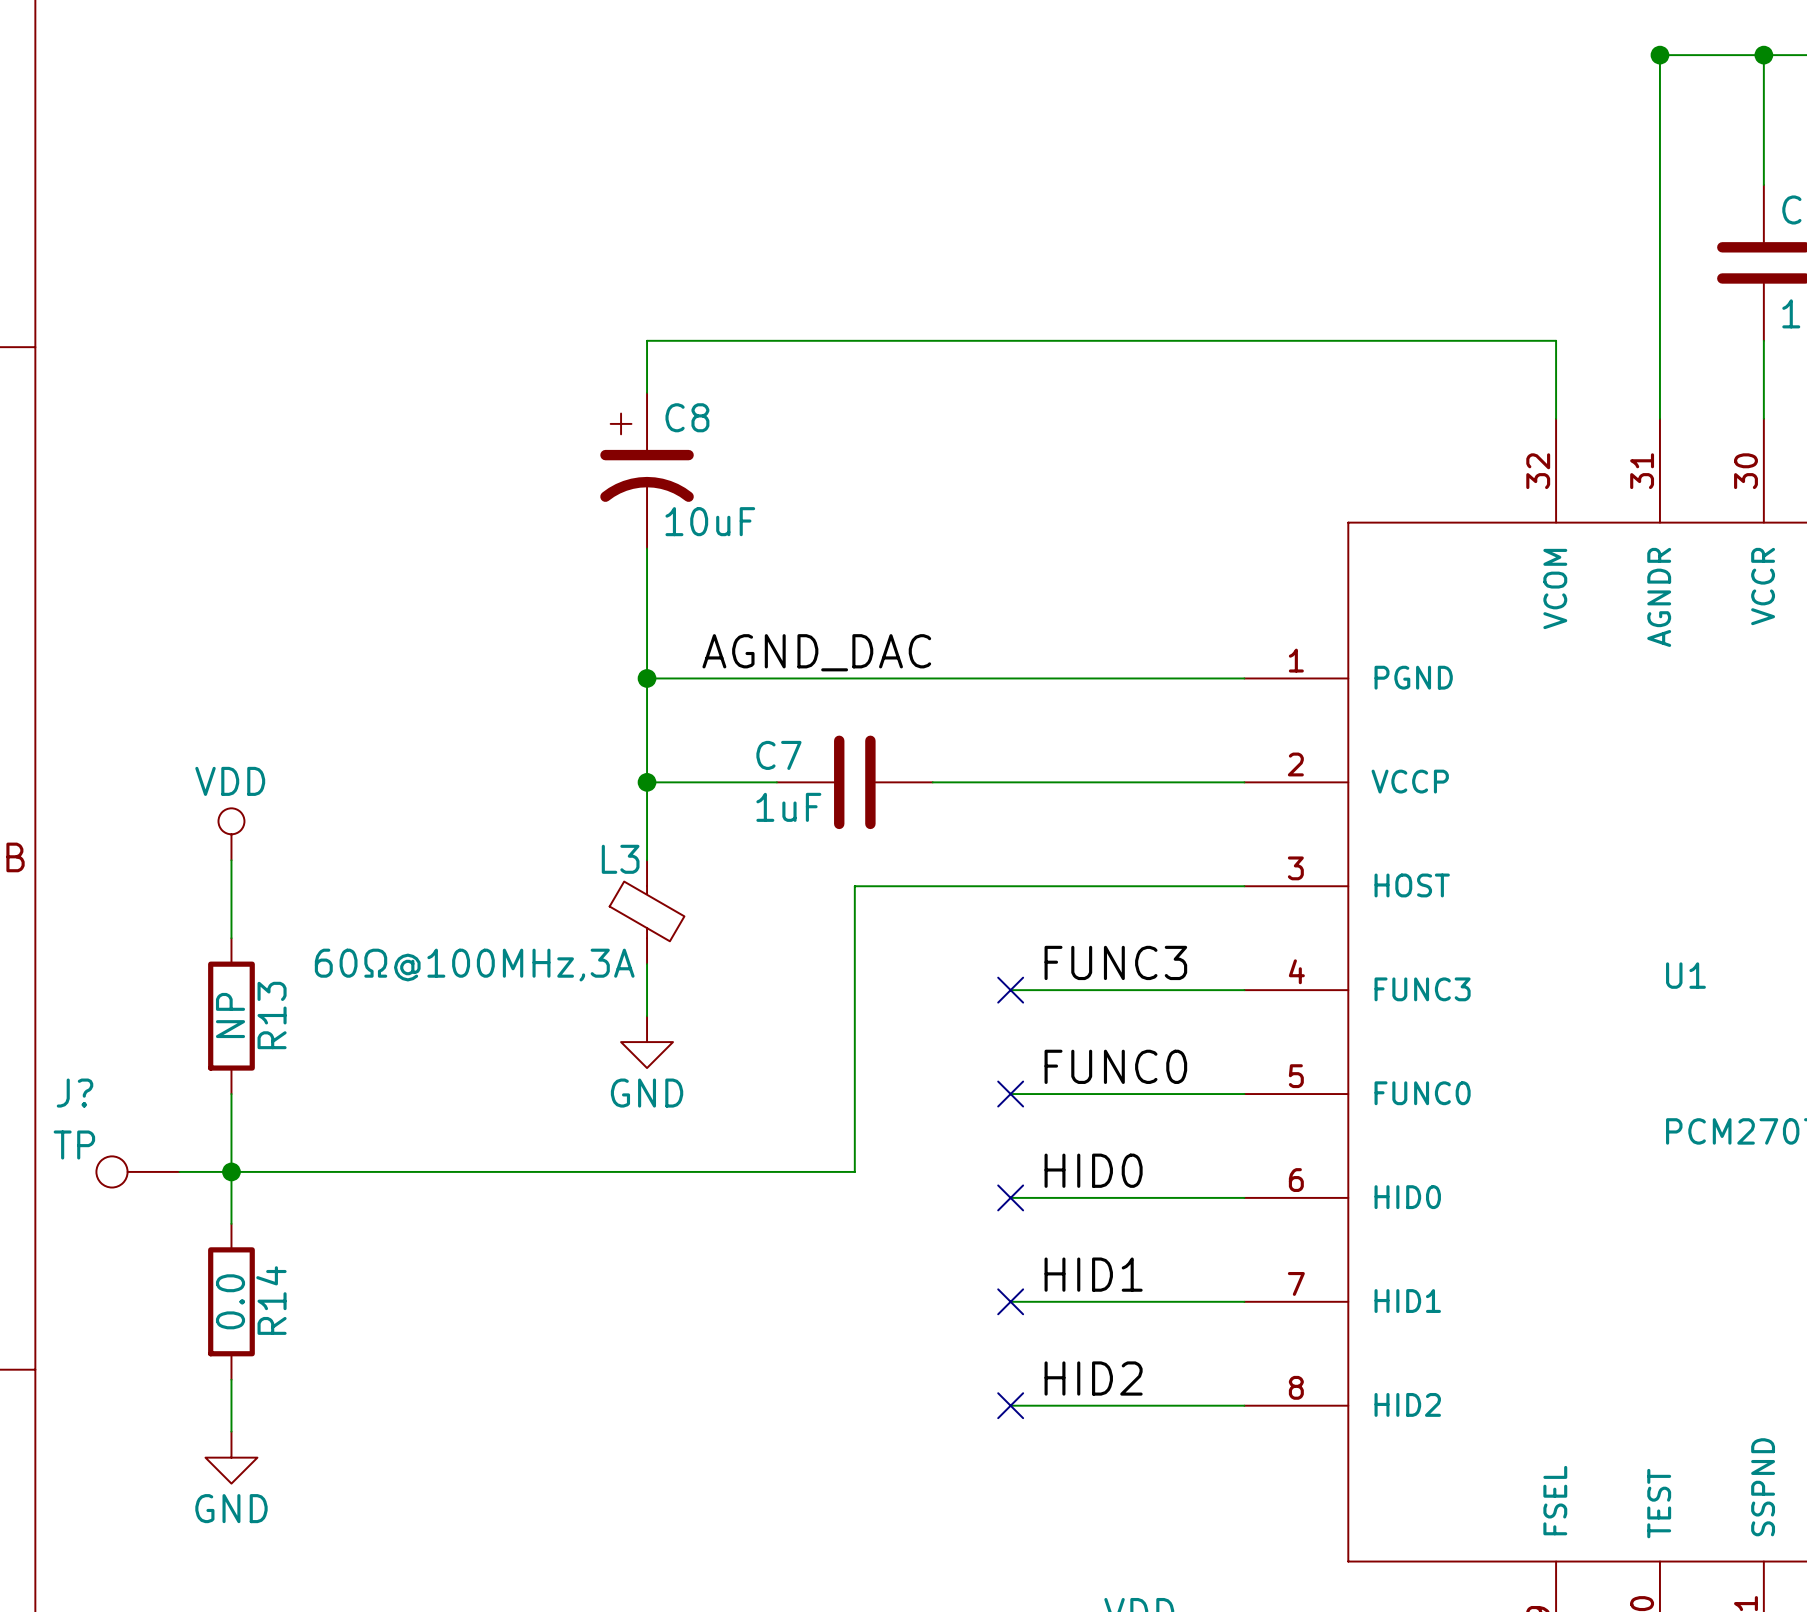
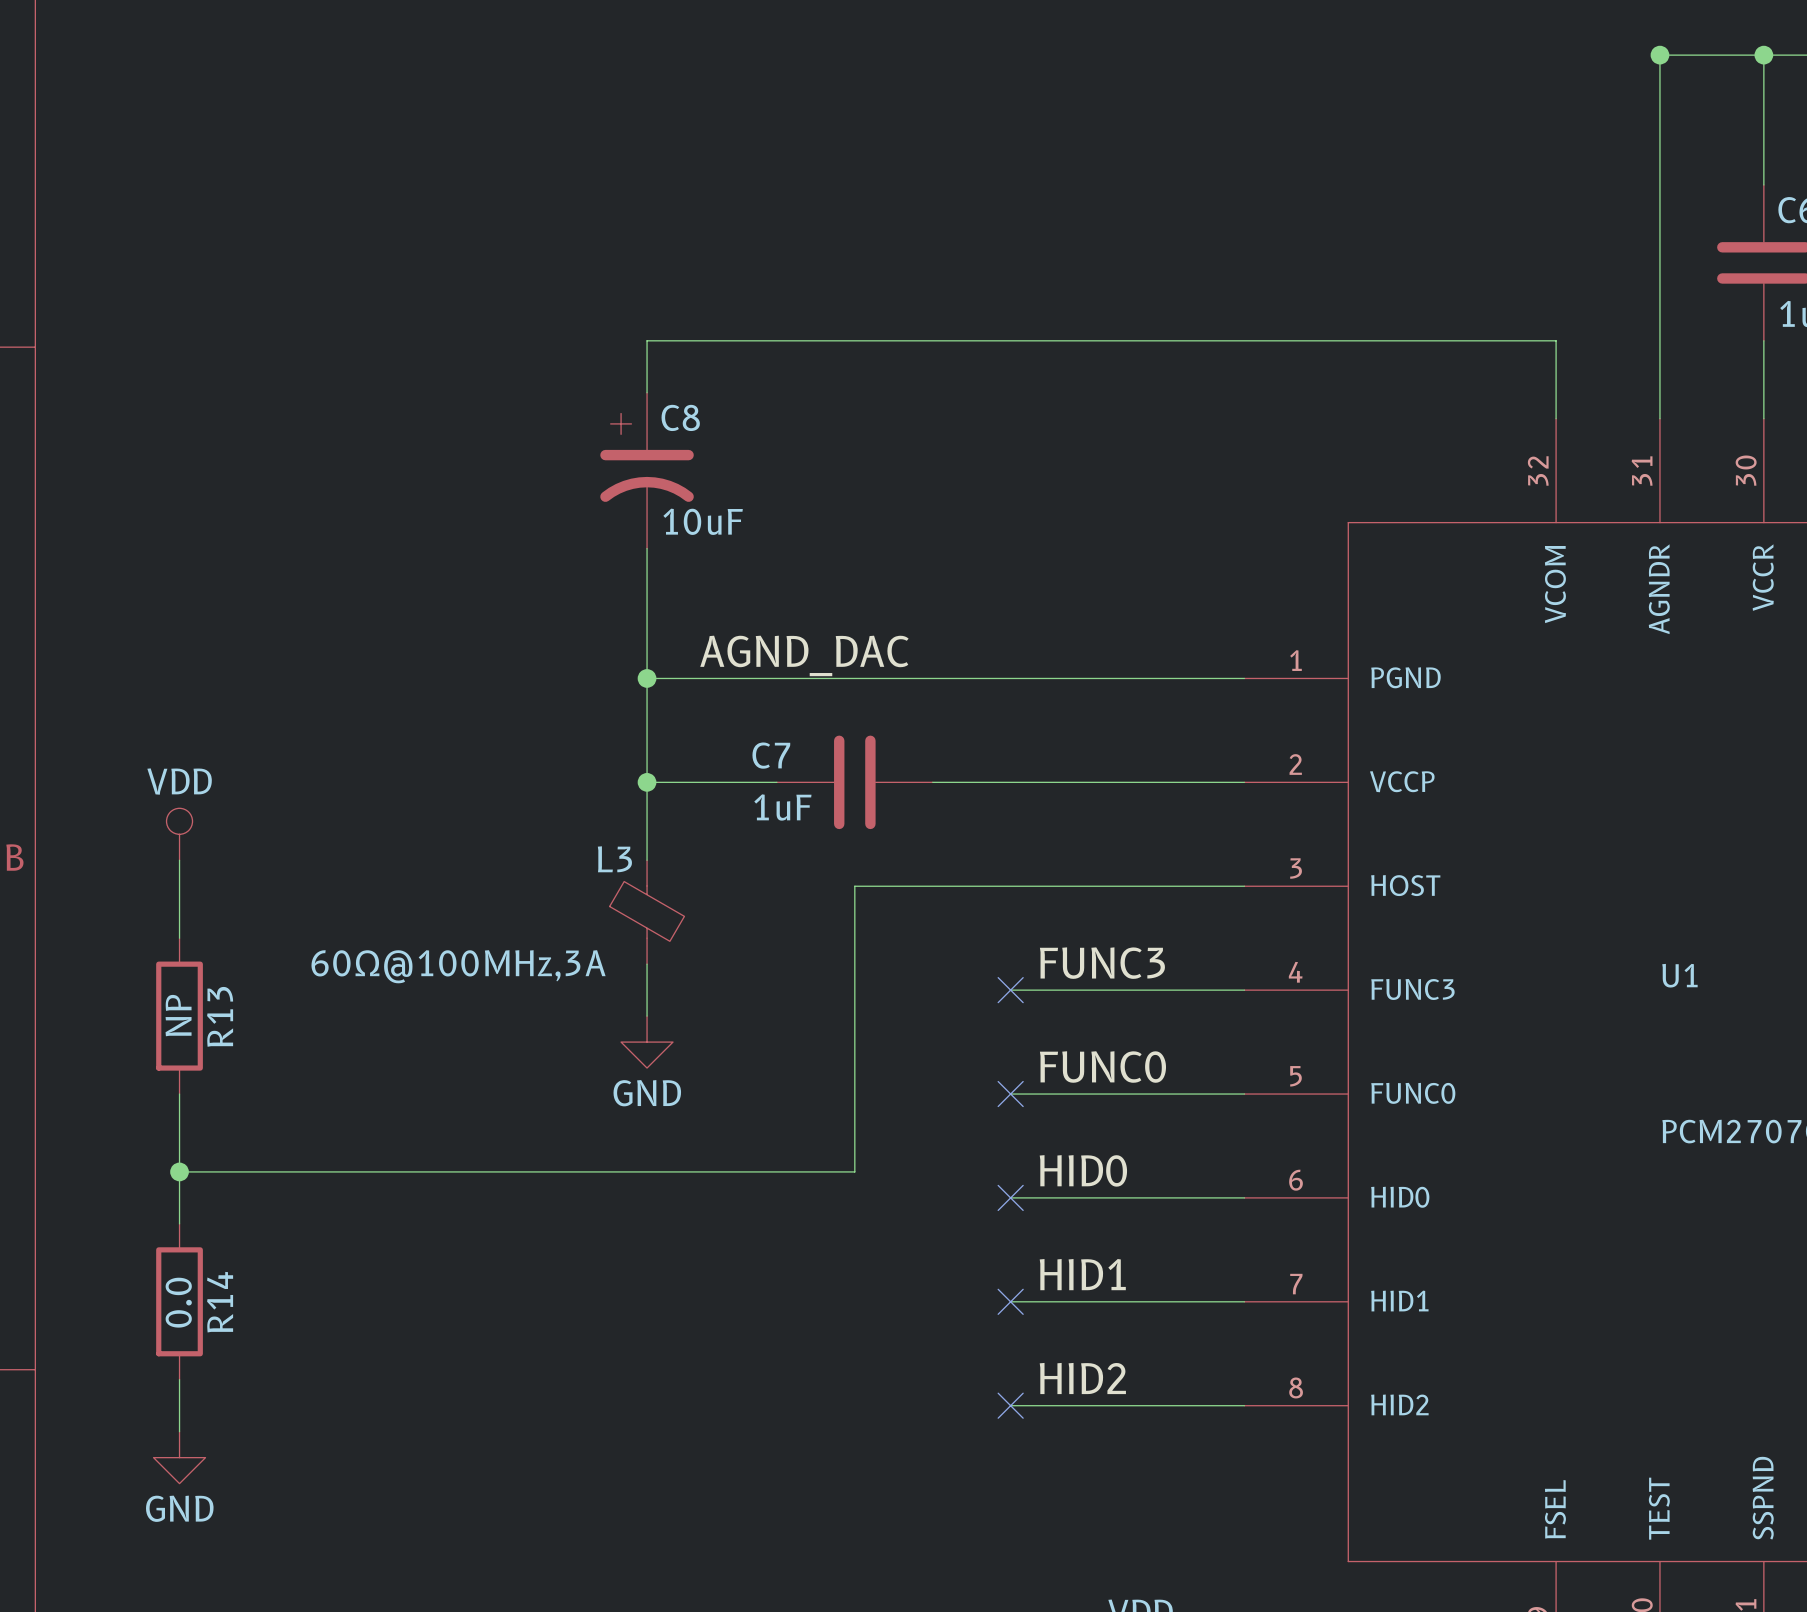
power symbol position: VDD (231, 834) -> VDD (179, 834)
wire: (231, 860) (231, 938) -> (179, 860) (179, 938)
R13 position: (231, 1016) -> (179, 1016)
wire: (231, 1094) (231, 1223) -> (179, 1094) (179, 1223)
J?: TP (137, 1171) -> none
junction position: (231, 1171) -> (179, 1171)
R14 position: (231, 1301) -> (179, 1301)
wire: (231, 1379) (231, 1431) -> (179, 1379) (179, 1431)
power symbol position: GND (231, 1457) -> GND (179, 1457)

